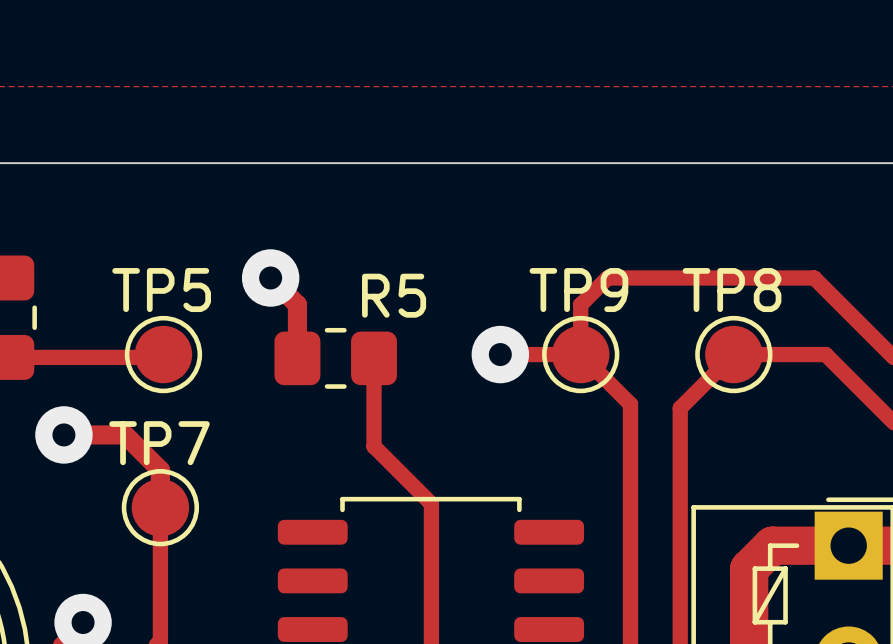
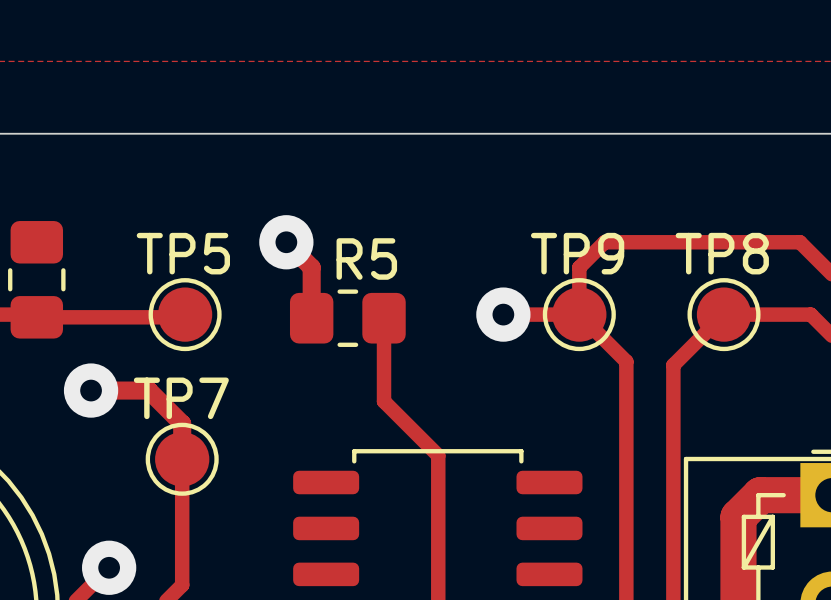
R5 name position: R5 (394, 295) -> R5 (366, 258)

